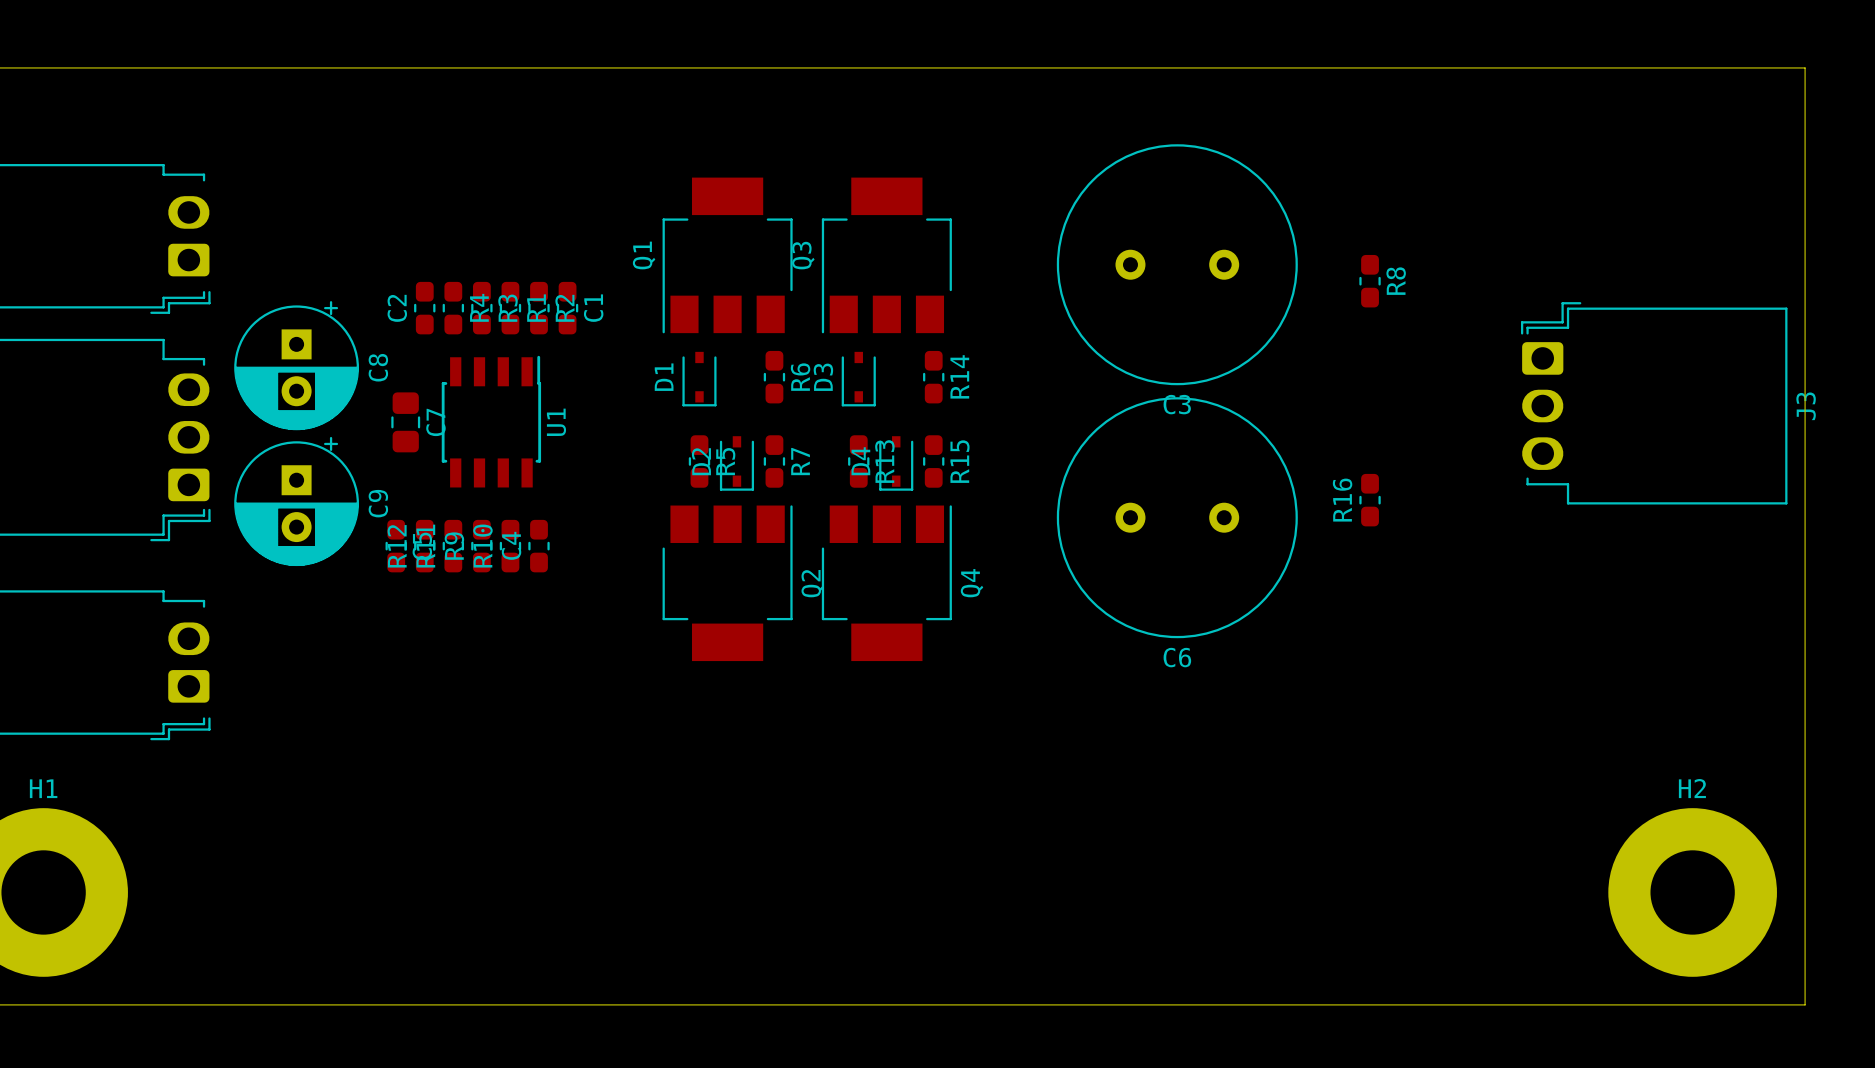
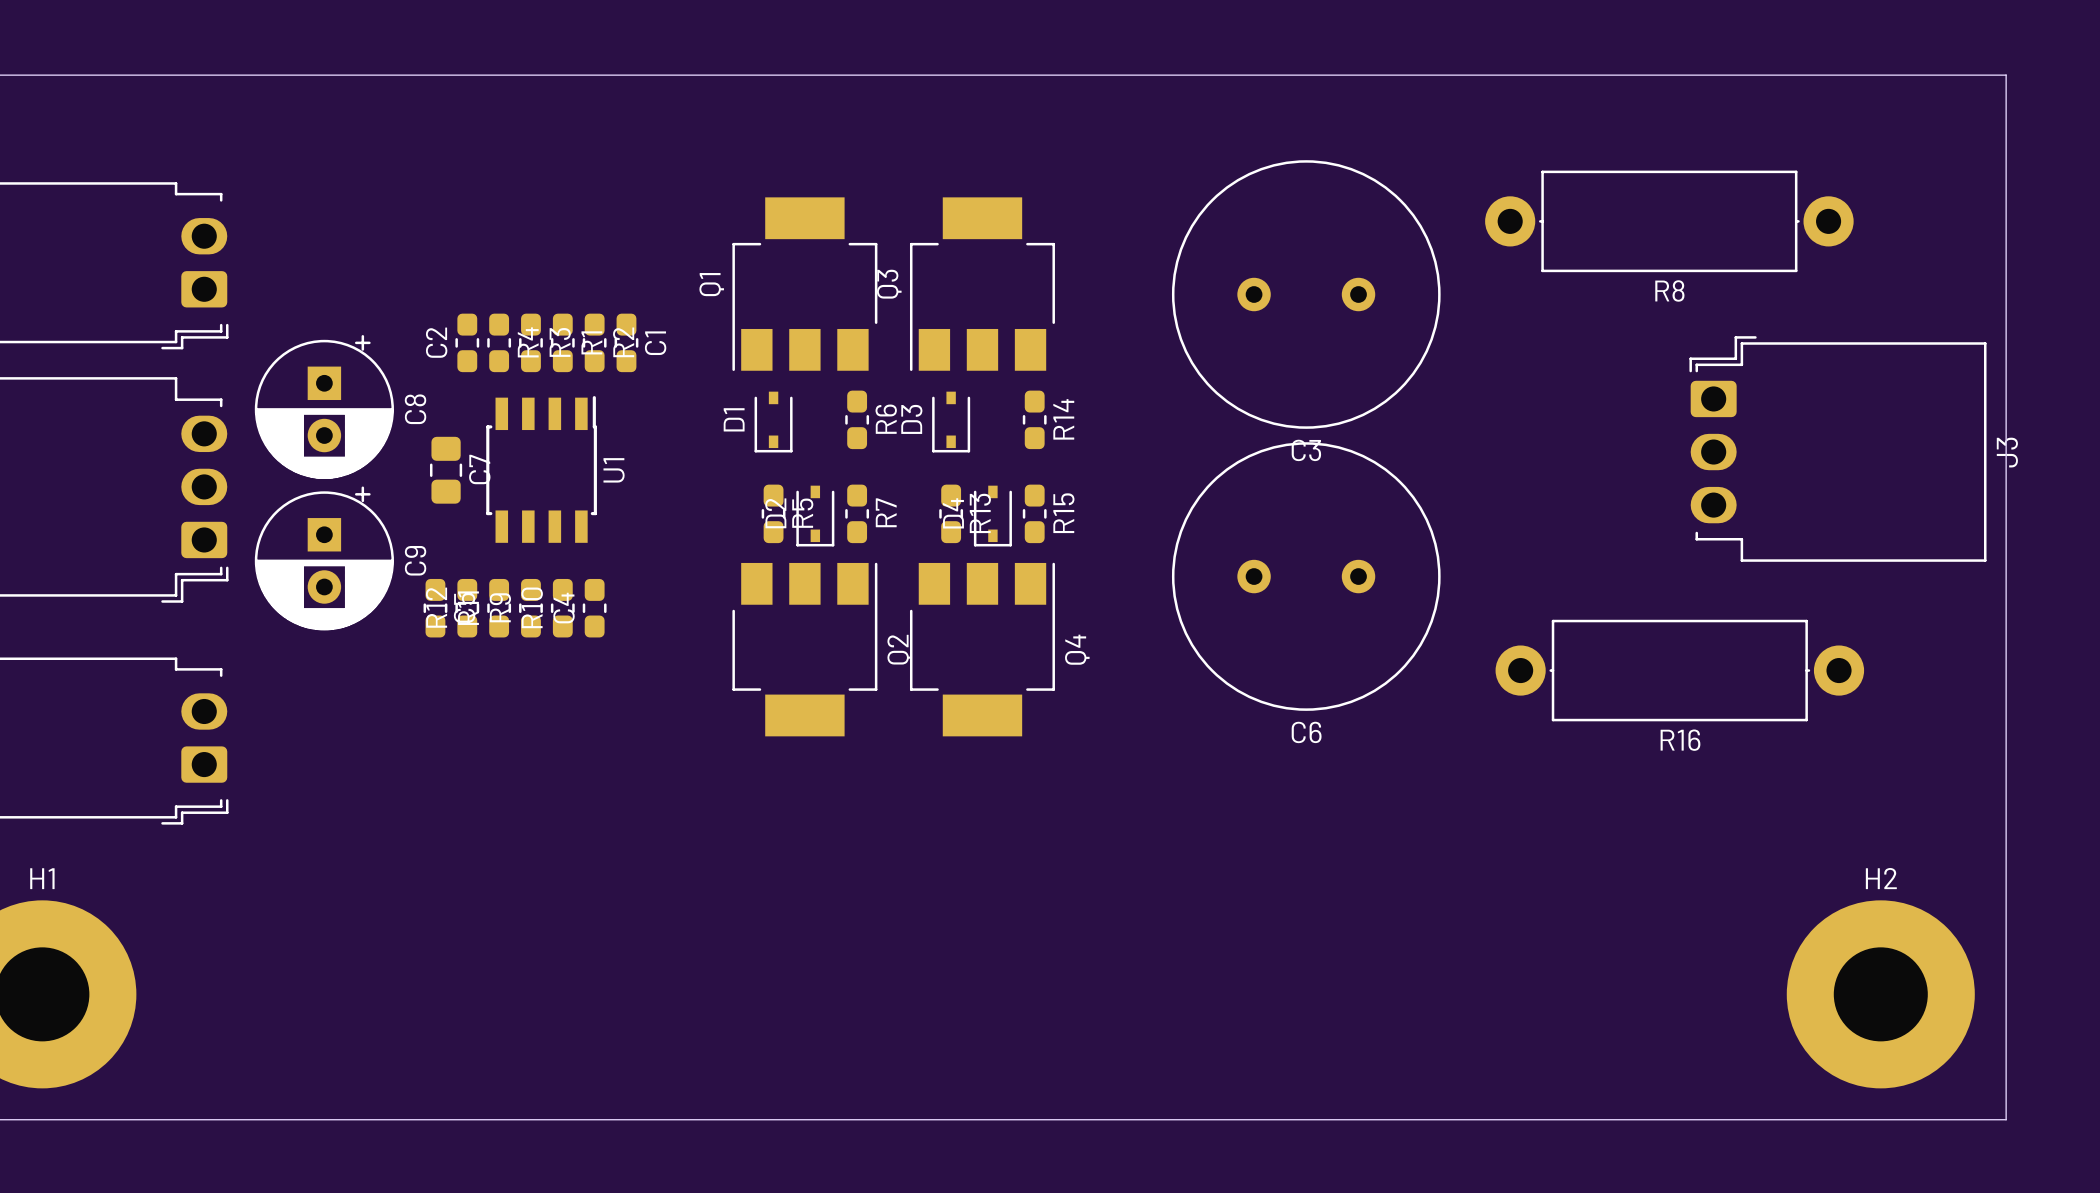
R8 footprint: [1359, 254, 1381, 308] -> [1485, 170, 1854, 273]
R8 name position: R8 (1396, 281) -> R8 (1669, 290)
R16 footprint: [1359, 473, 1381, 527] -> [1495, 619, 1865, 722]
R16 name position: R16 (1342, 500) -> R16 (1680, 740)

